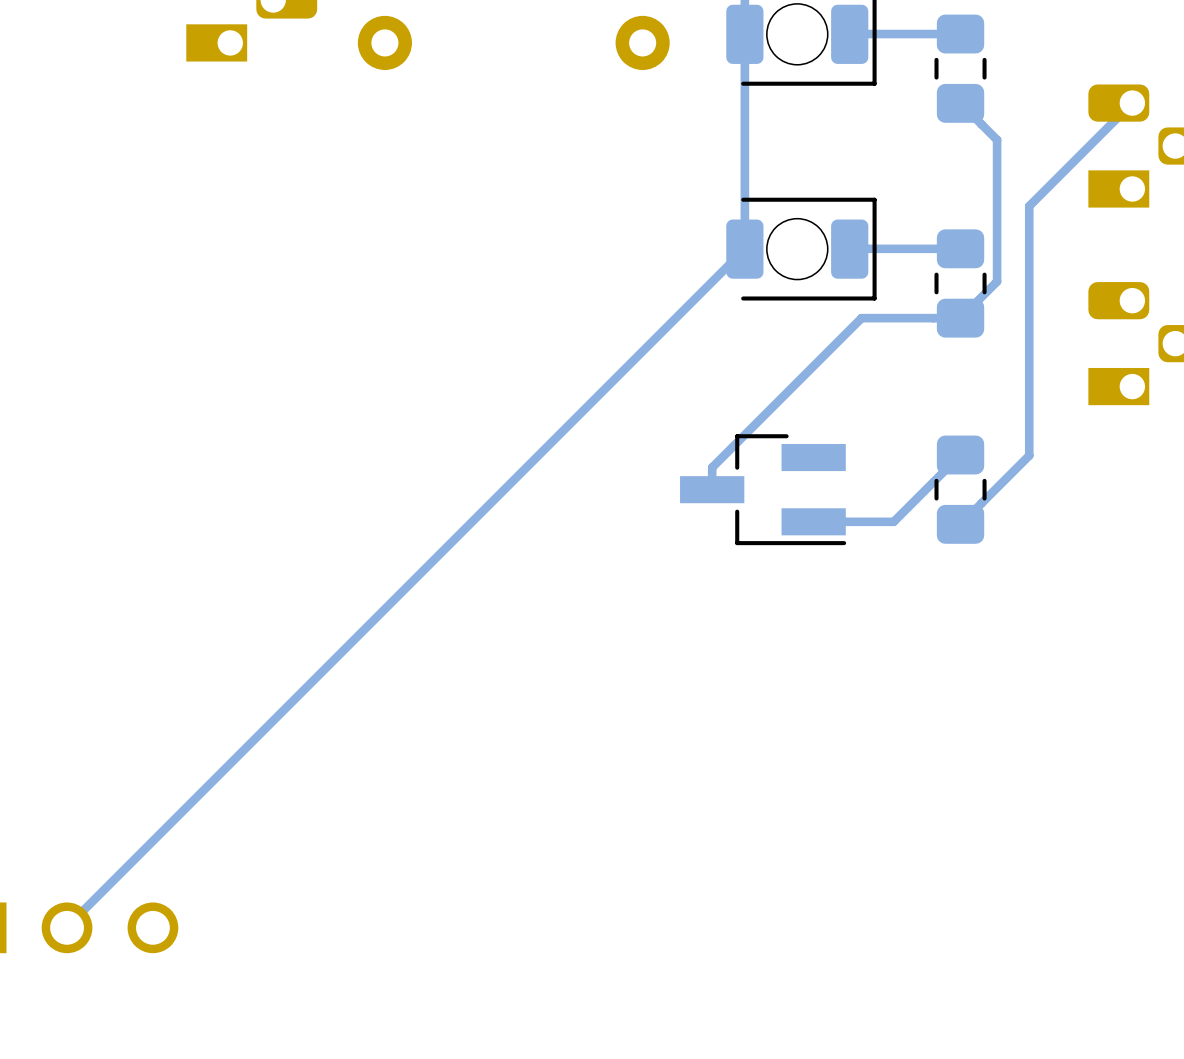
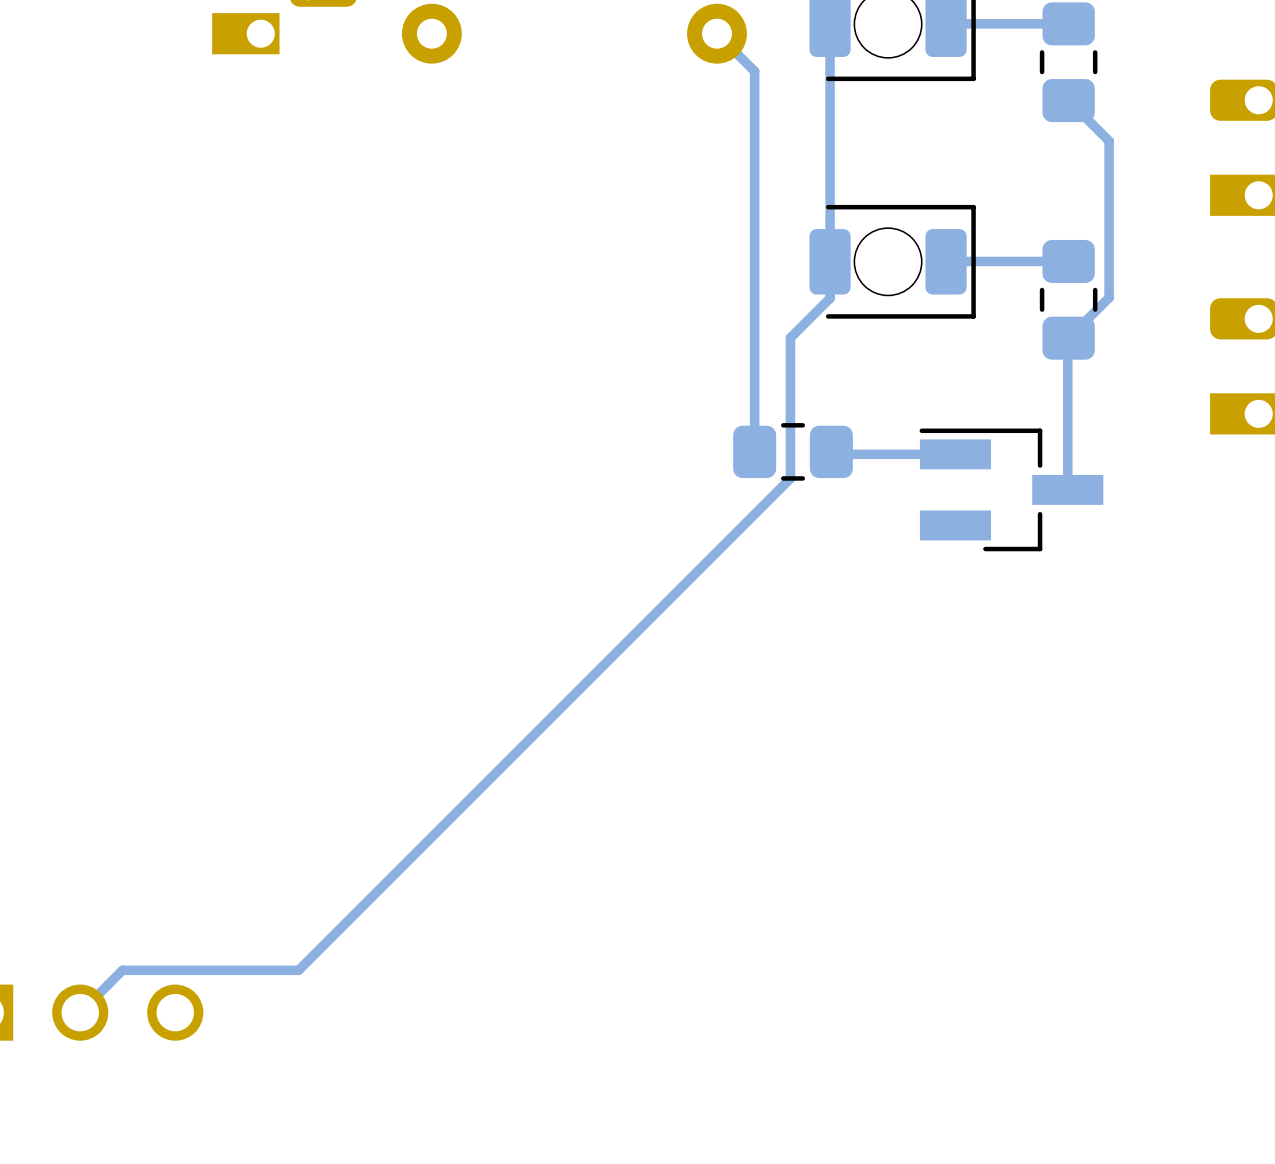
track: none -> (716, 33) (754, 71) (754, 451)
track: (1132, 103) (1029, 206) (1029, 455) (960, 524) -> none
track: (744, 249) (67, 927) -> (830, 261) (830, 298) (790, 337) (790, 478) (298, 970) (122, 970) (80, 1012)
track: (960, 318) (861, 318) (712, 467) (712, 489) -> (1068, 338) (1067, 489)
track: none -> (831, 451) (833, 454) (955, 454)
track: (960, 455) (893, 521) (813, 521) -> none
part rotation: 0° (763, 489) -> 180° (1011, 489)
part position: (763, 489) -> (1011, 489)
part rotation: 0° (960, 489) -> 90° clockwise (793, 451)
part position: (960, 489) -> (793, 451)

